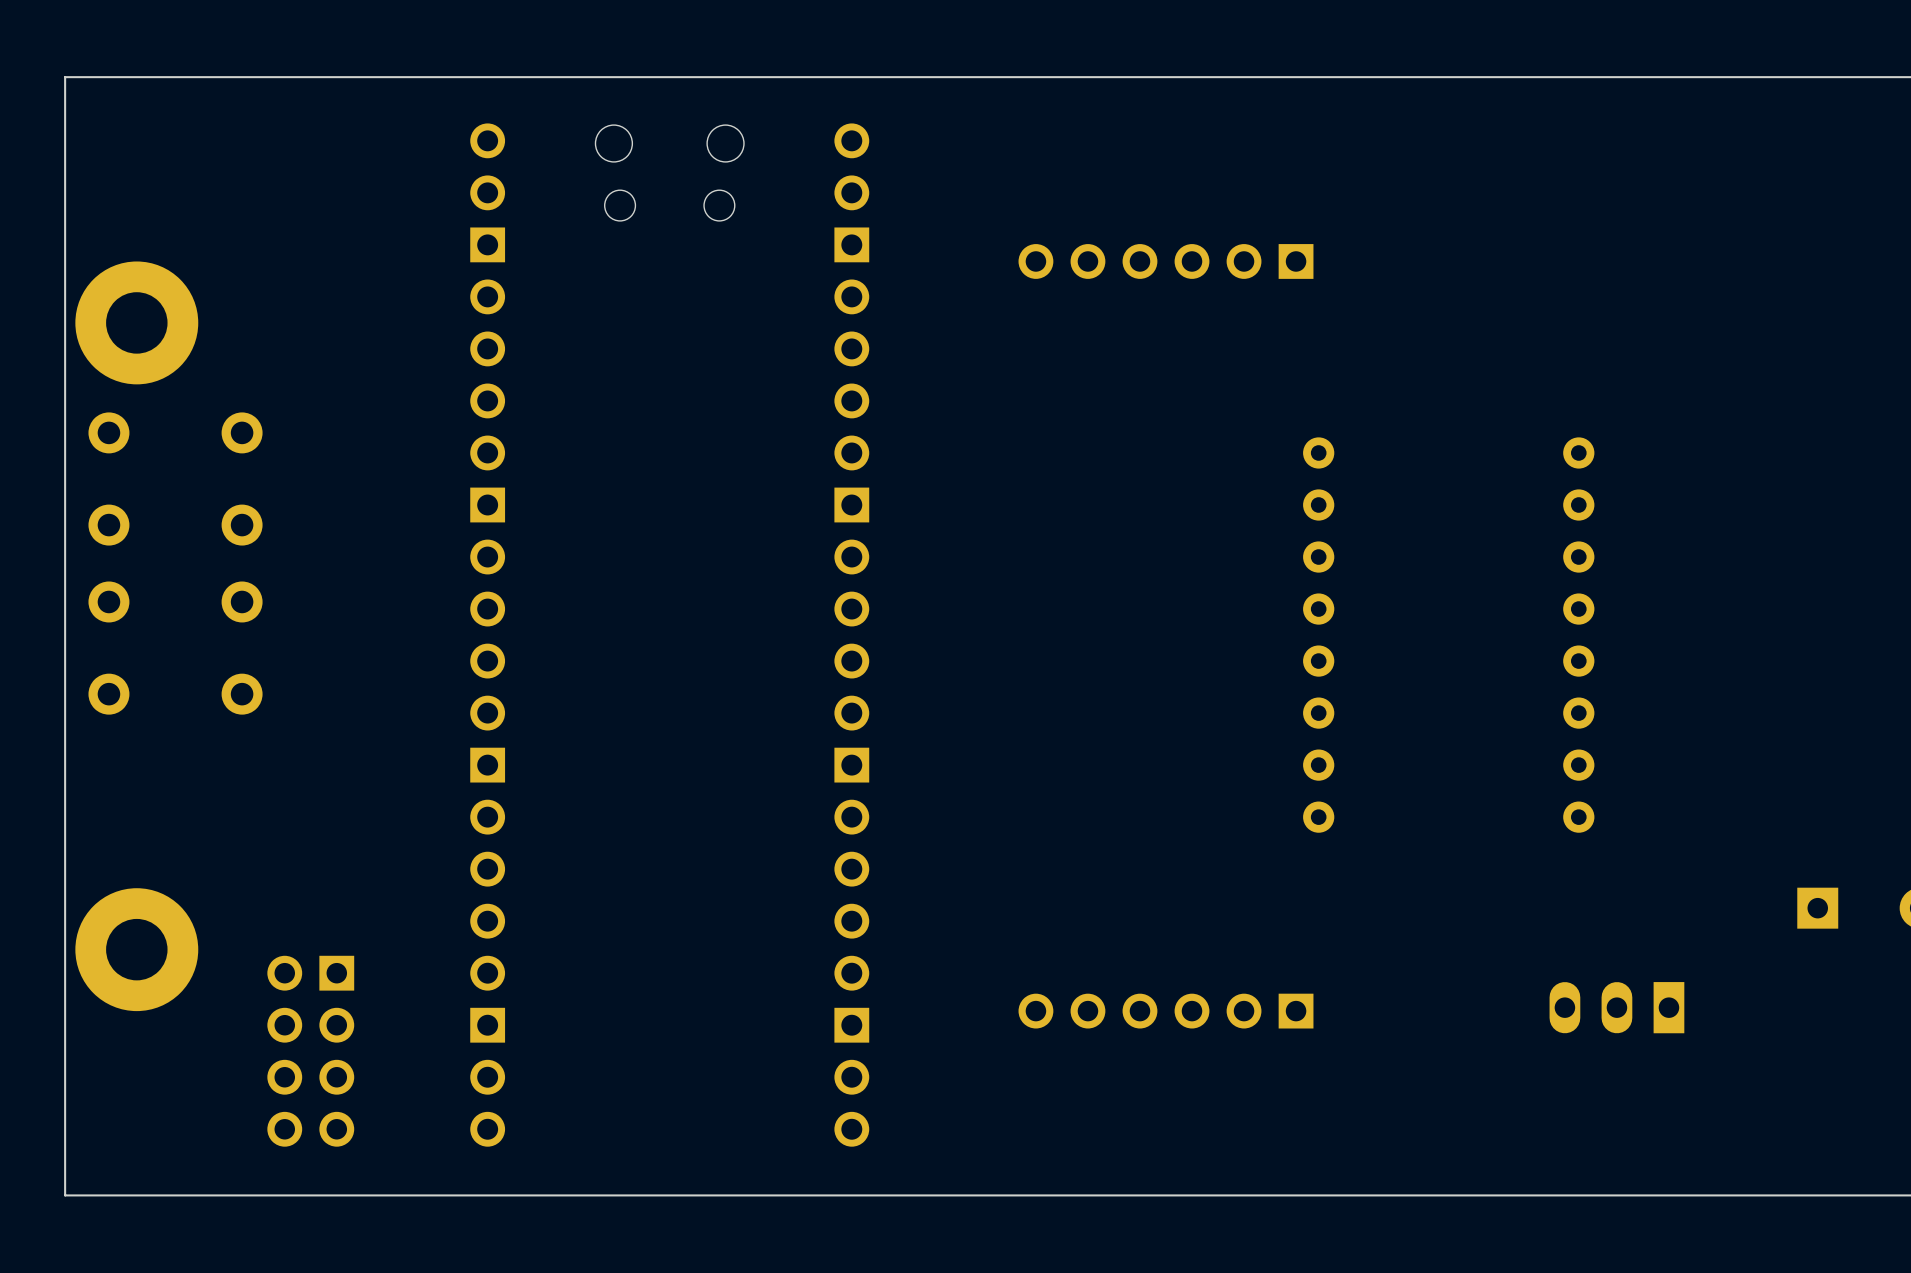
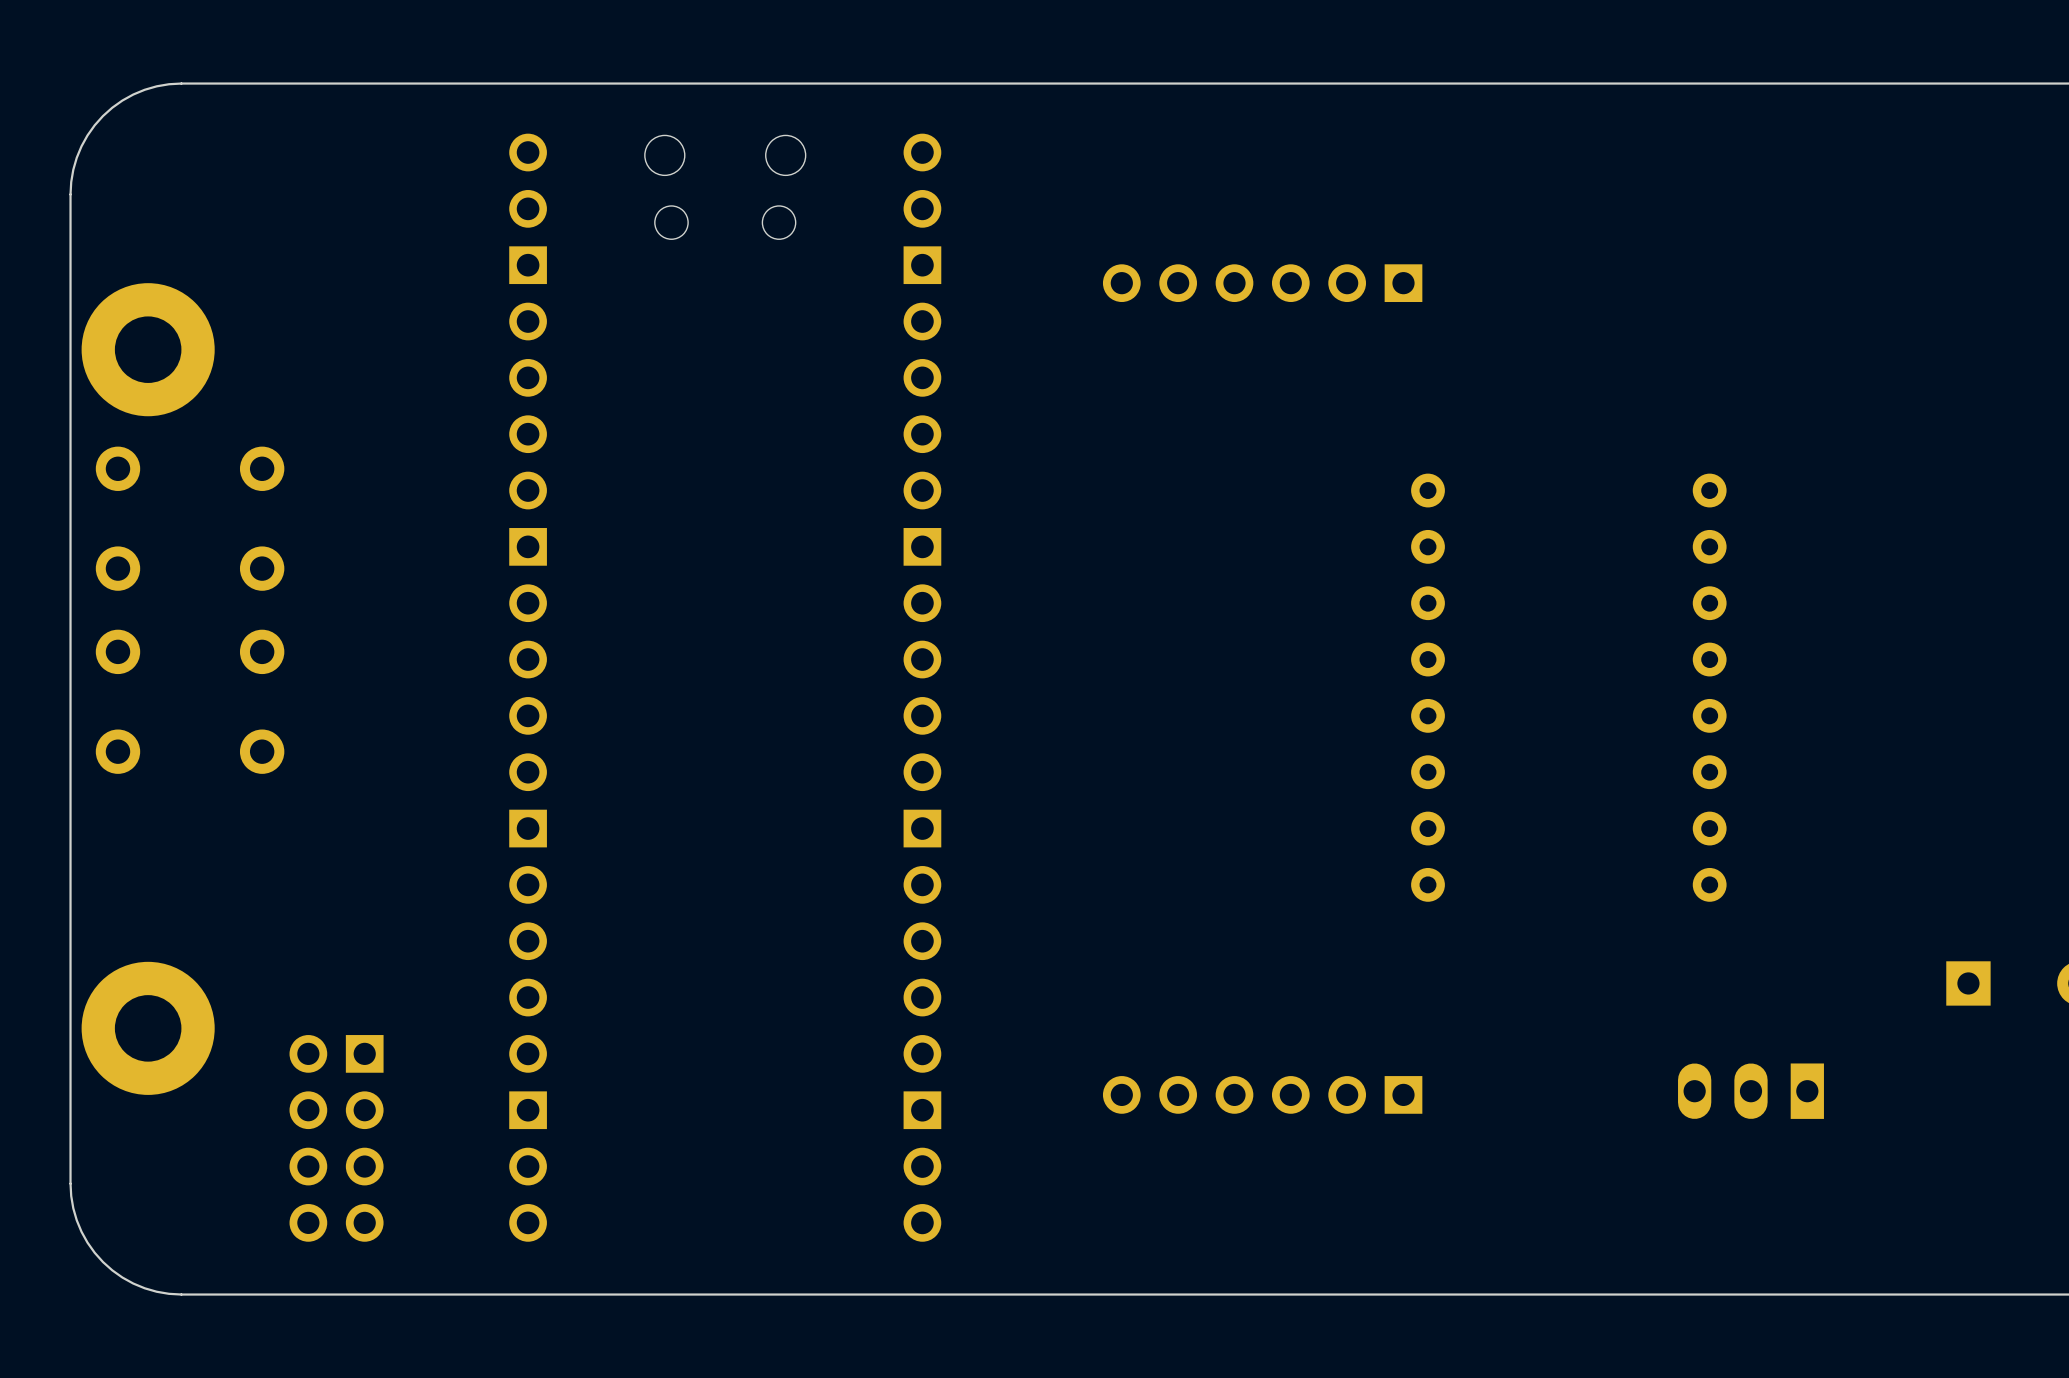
board edge: (167, 77) (65, 77) (65, 179) -> (181, 83) (144, 89) (122, 100) (103, 116) (81, 146) (73, 169) (70, 194)
board edge: (65, 1093) (65, 1195) (167, 1195) -> (70, 1183) (76, 1220) (87, 1242) (103, 1262) (133, 1283) (156, 1291) (181, 1294)

